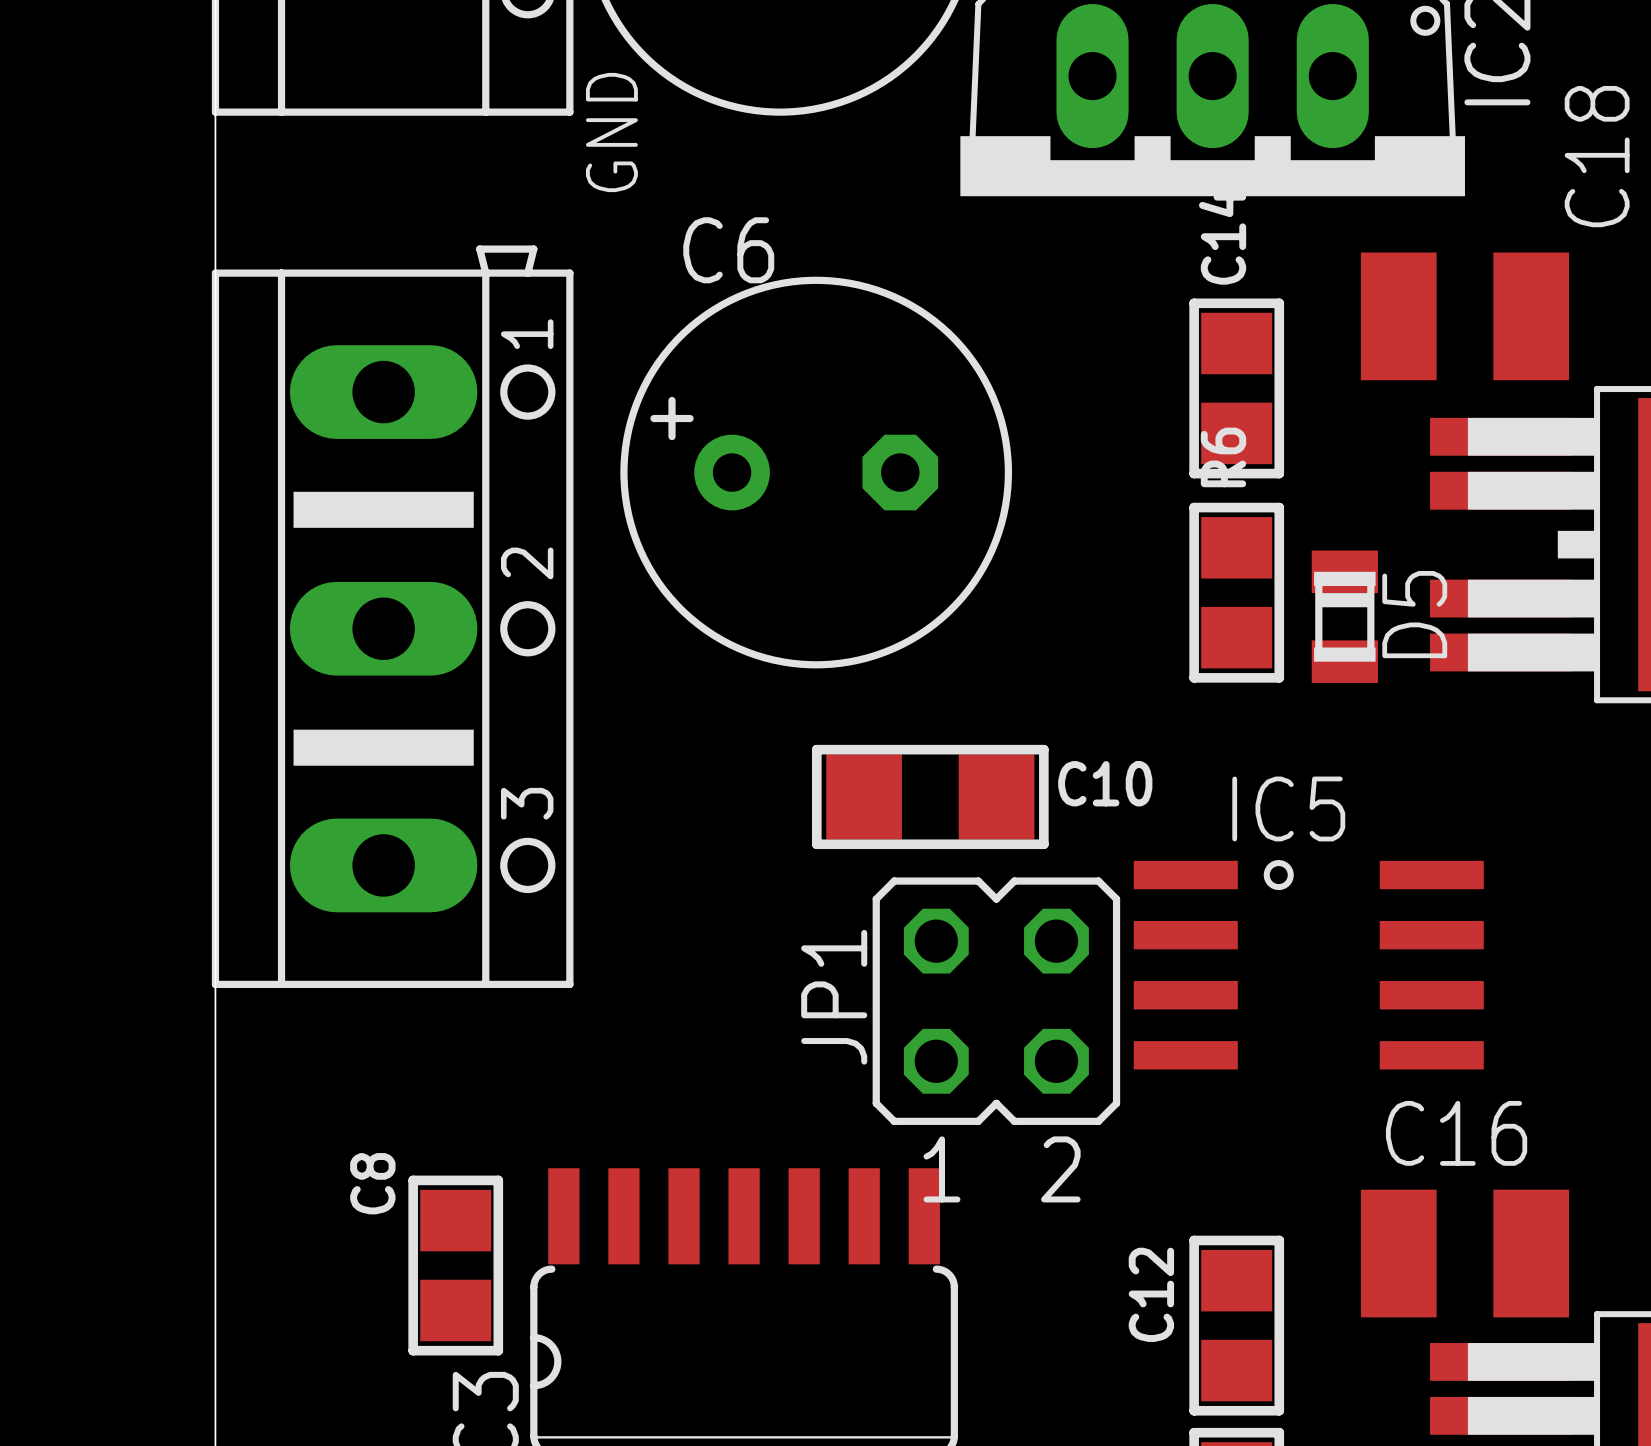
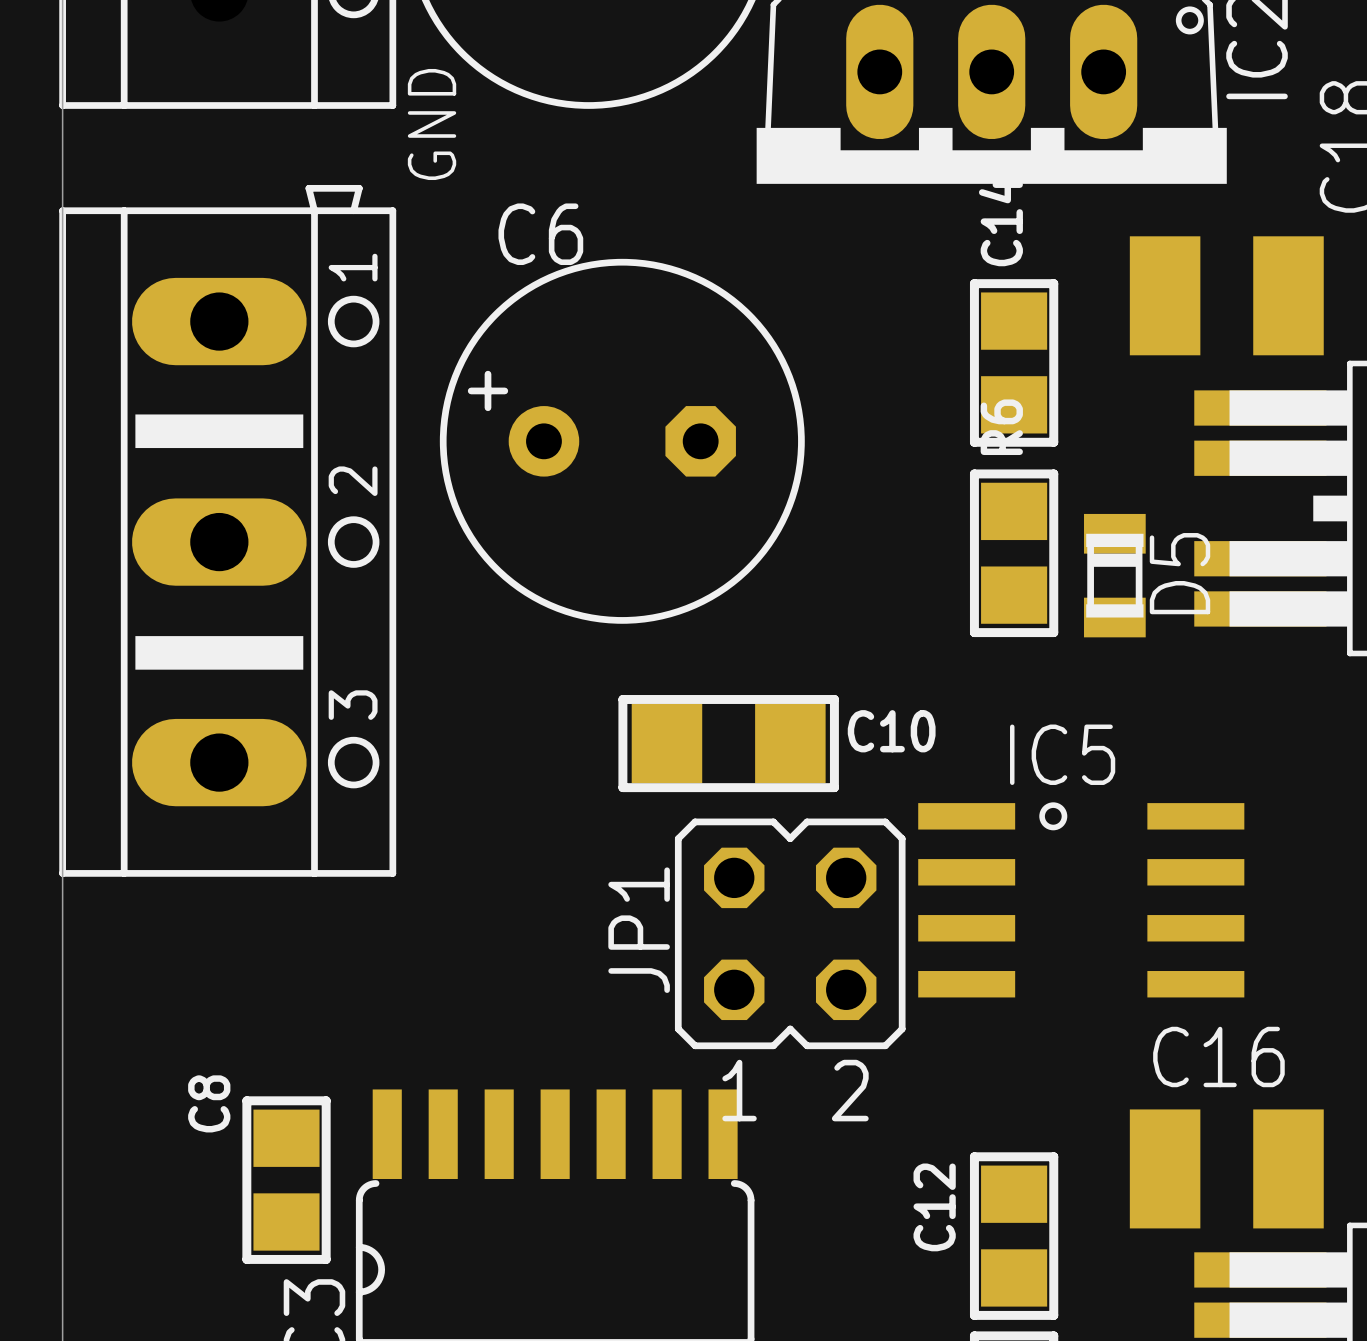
part position: (392, 616) -> (227, 530)

